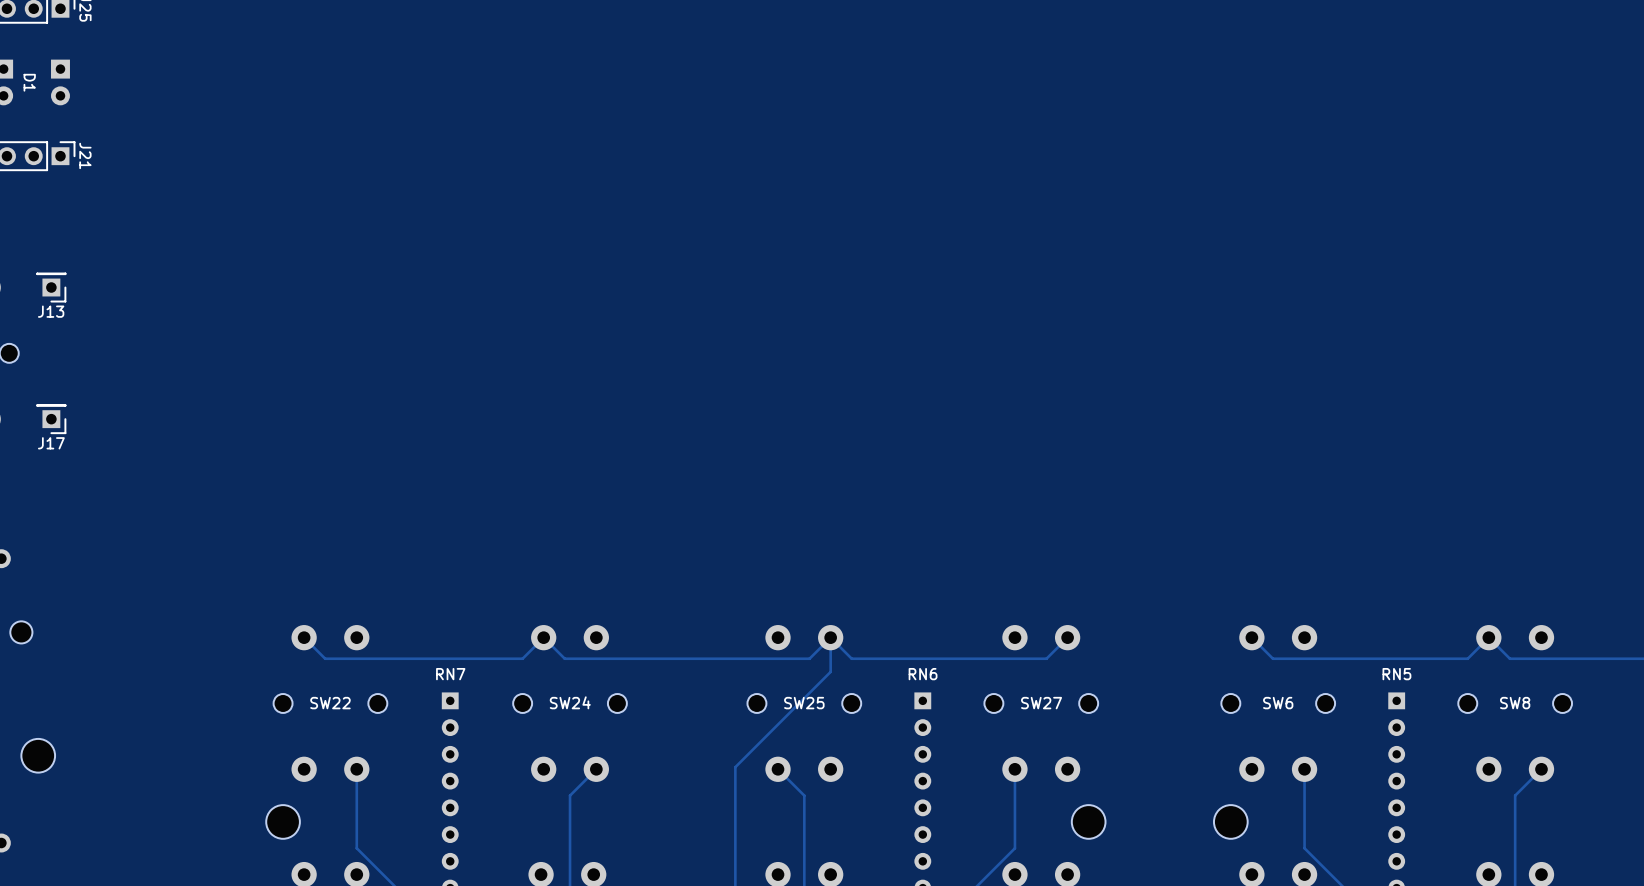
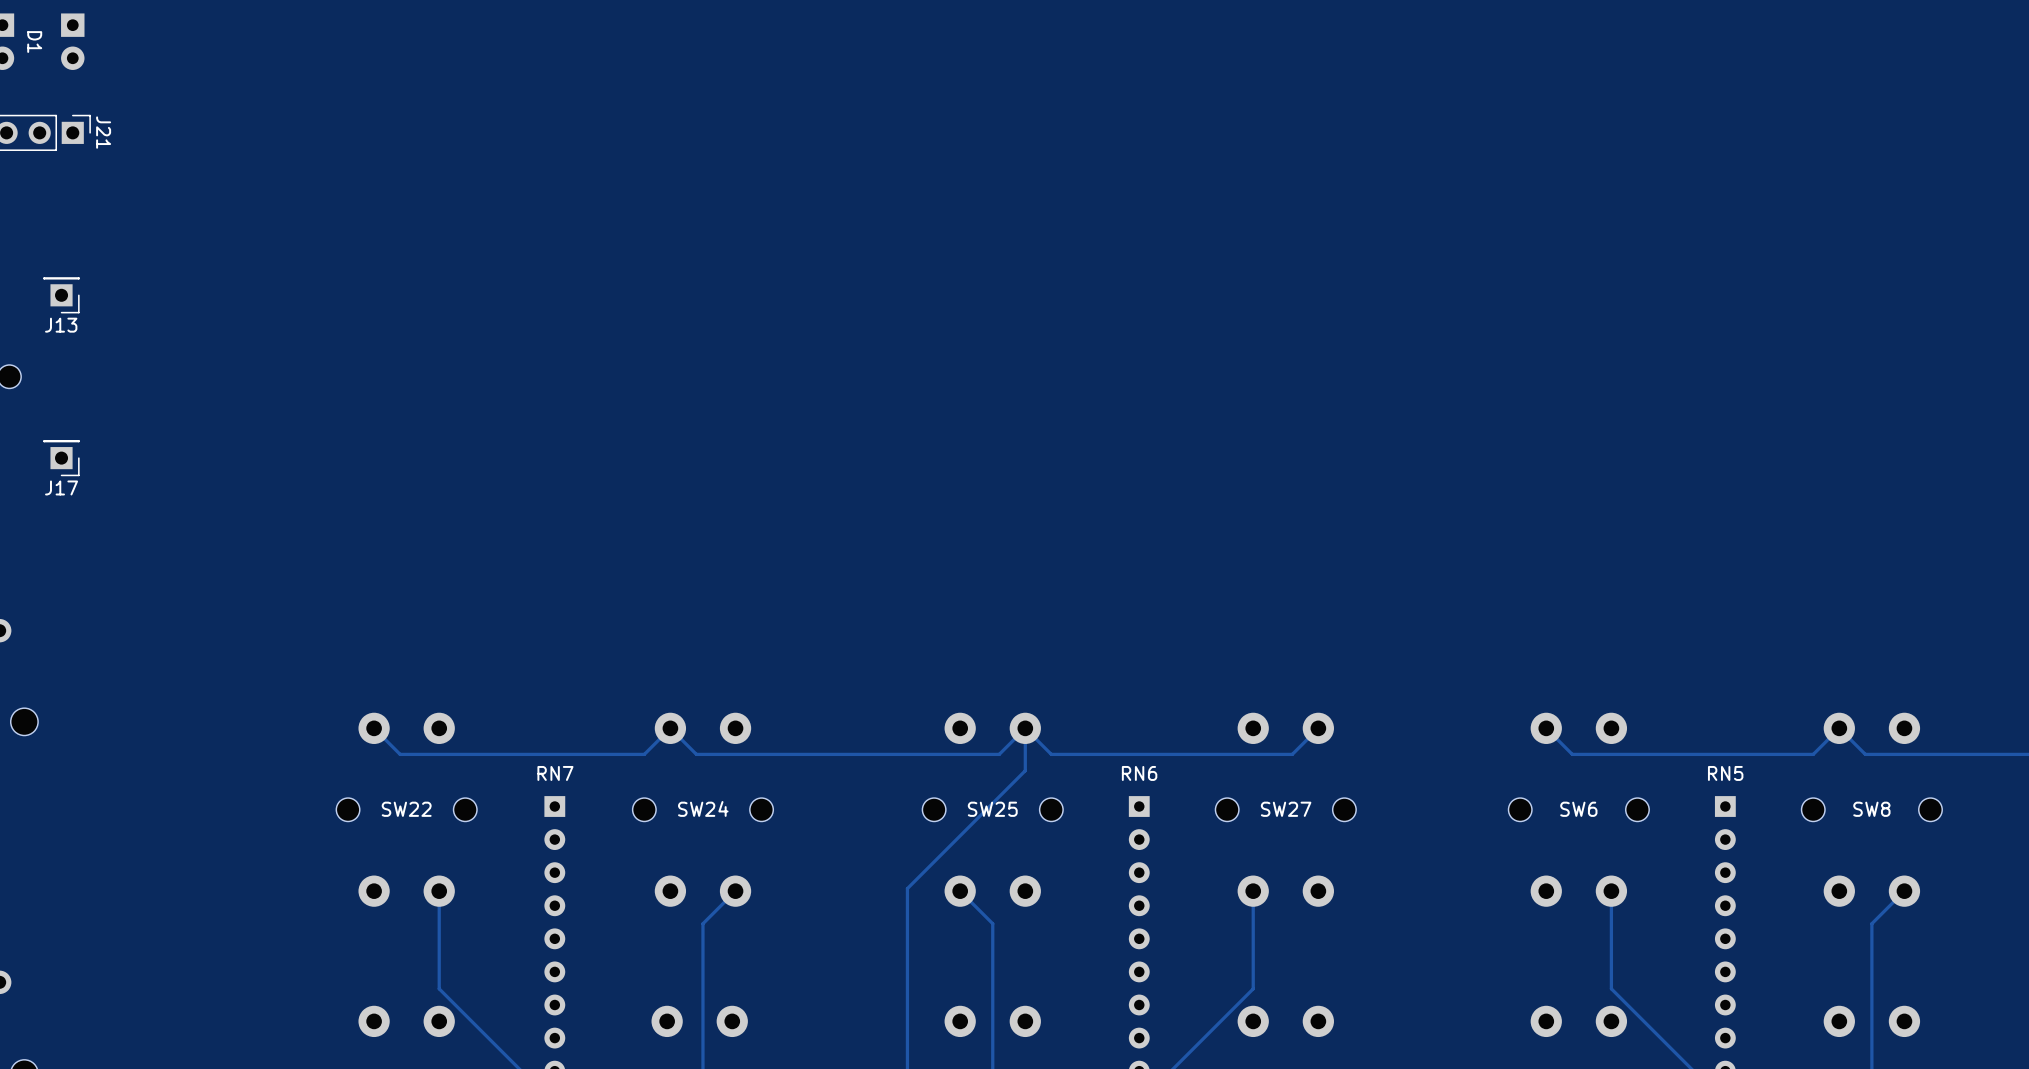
part: (38, 755) -> none
part: (283, 821) -> none
part: (1088, 821) -> none
part: (1230, 821) -> none

